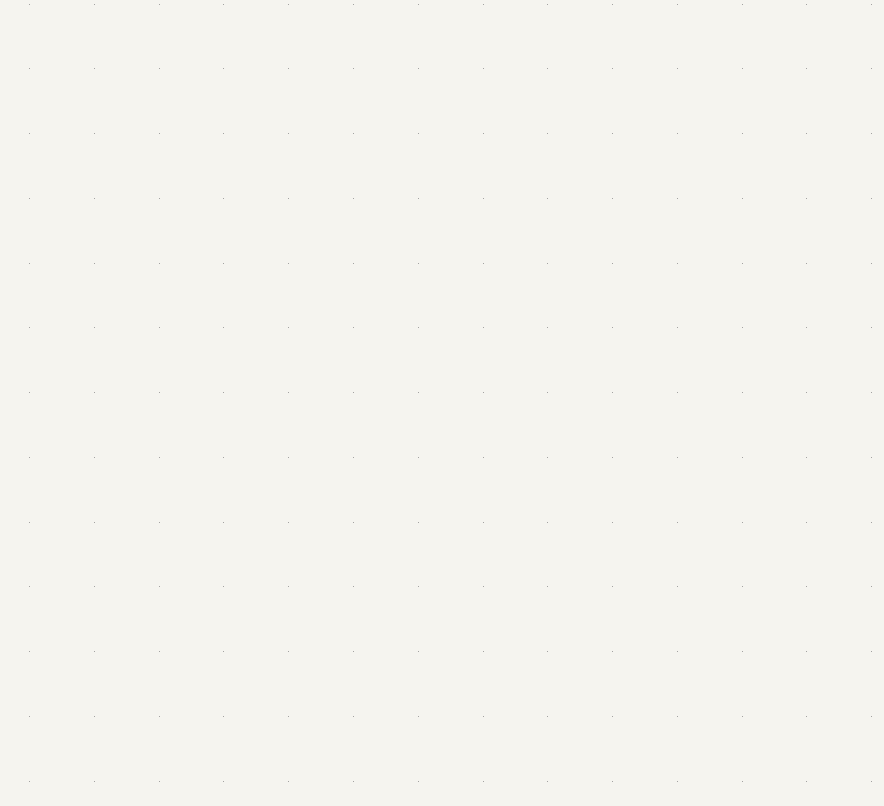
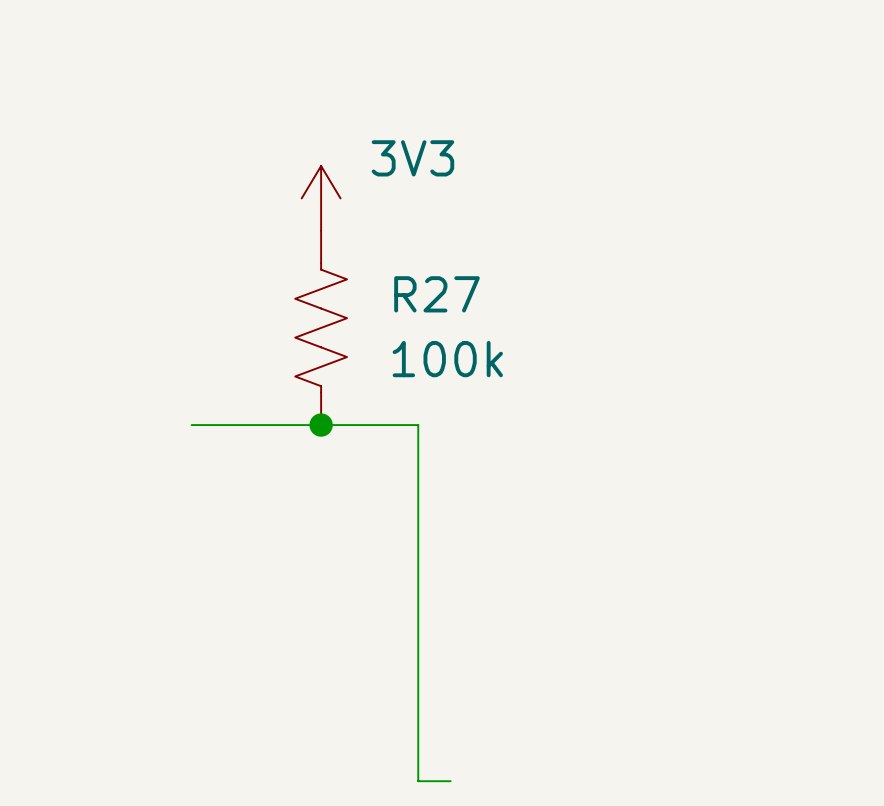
power symbol: none -> 3V3 (321, 198)
R27: none -> 100k (321, 327)
wire: none -> (191, 425) (418, 425) (418, 781) (450, 781)
junction: none -> (321, 425)

